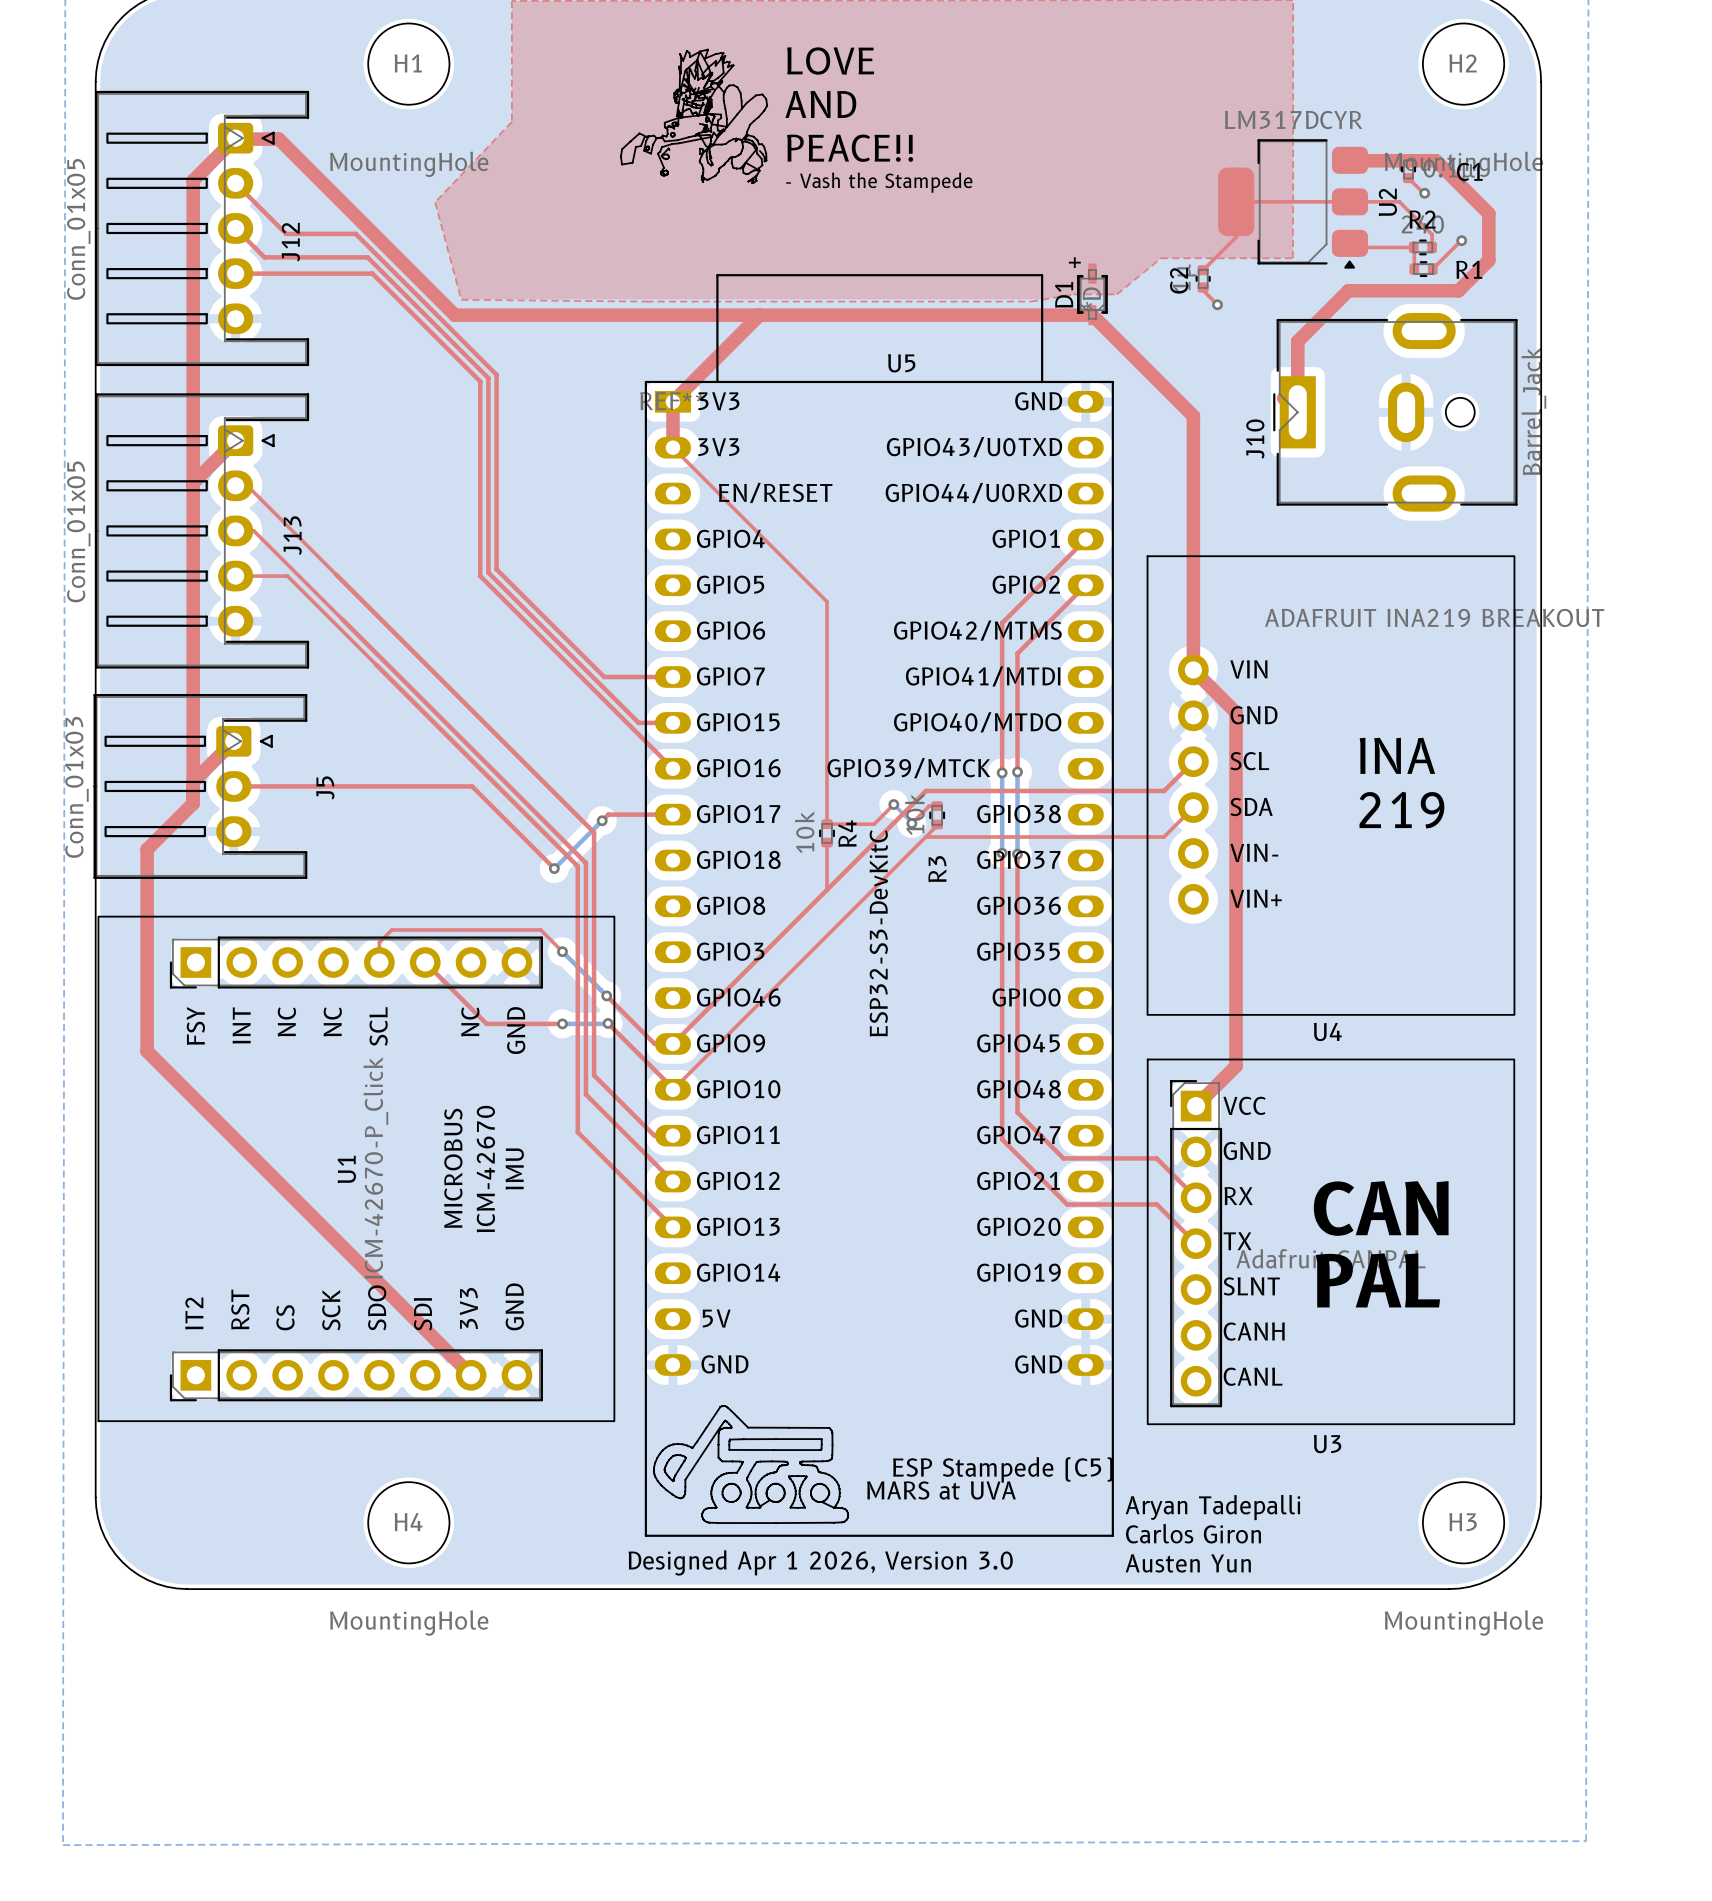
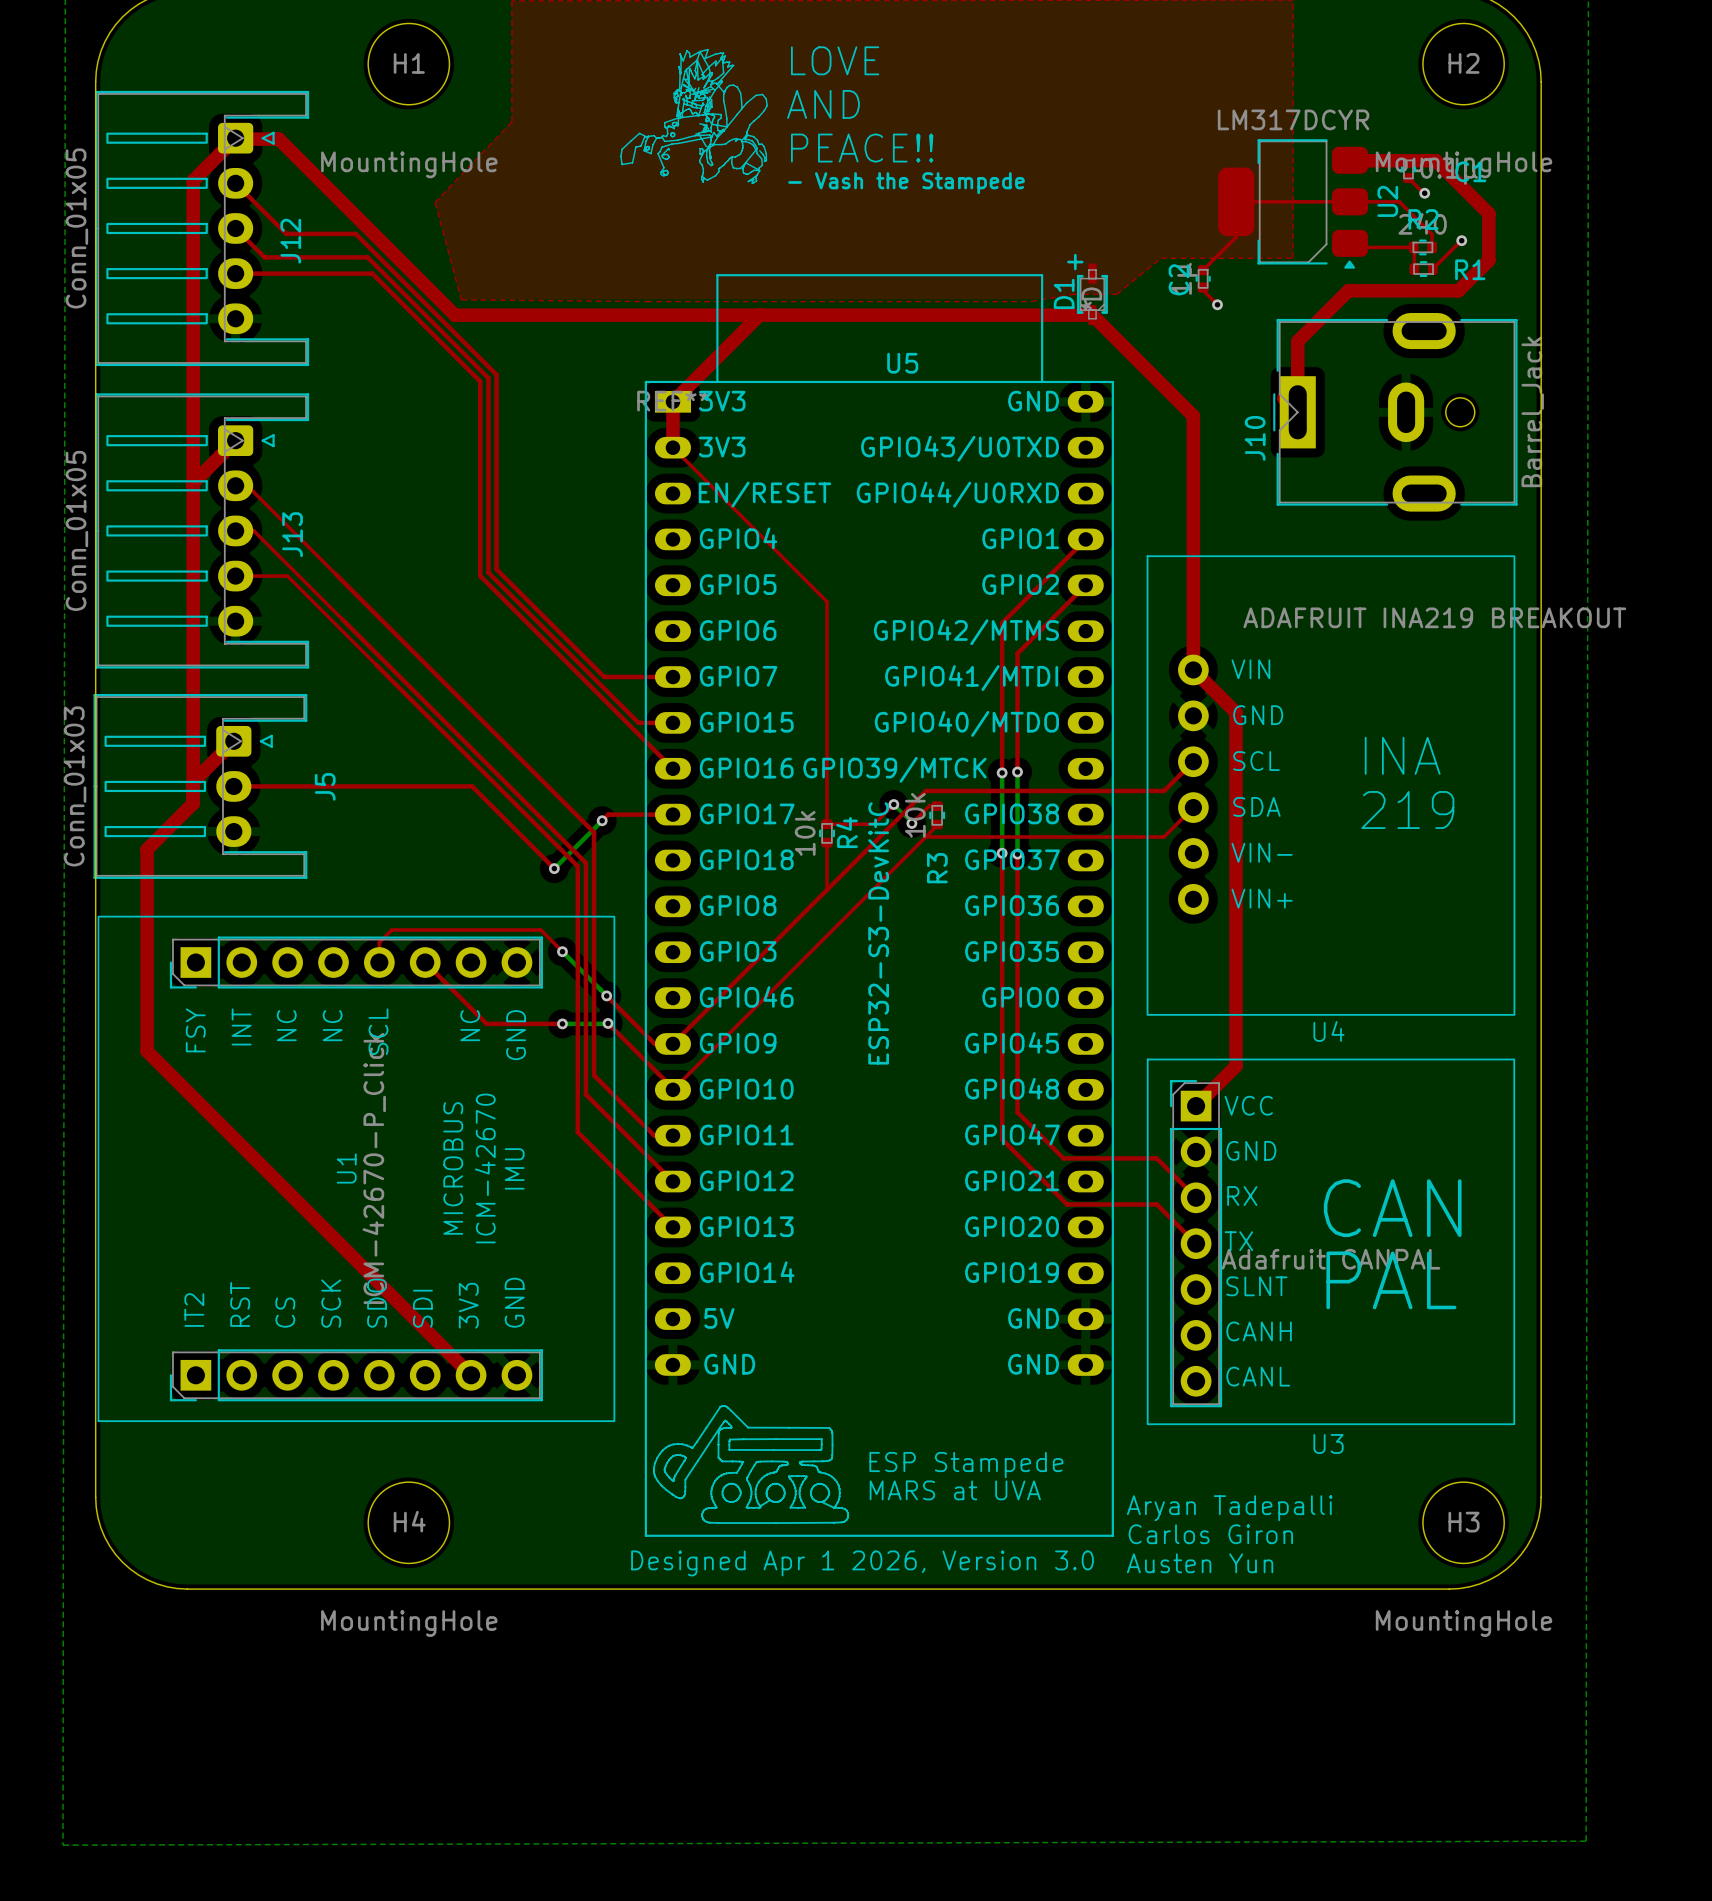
text: ESP Stampede (C5) (1002, 1469) -> ESP Stampede (966, 1465)

